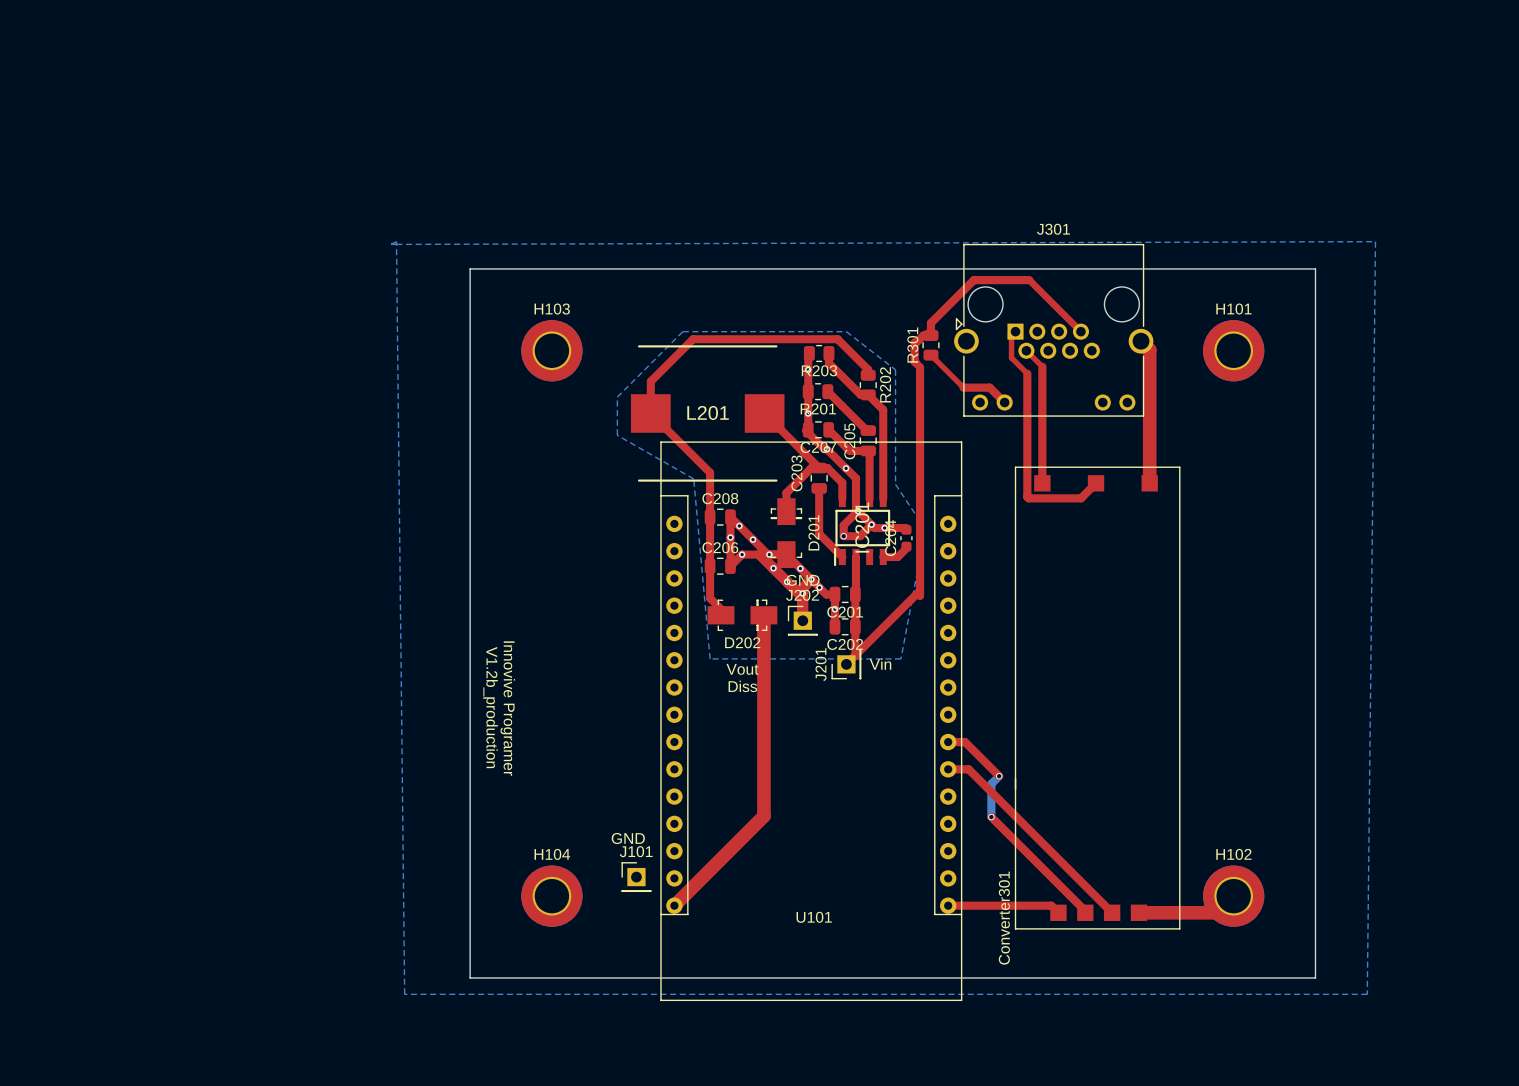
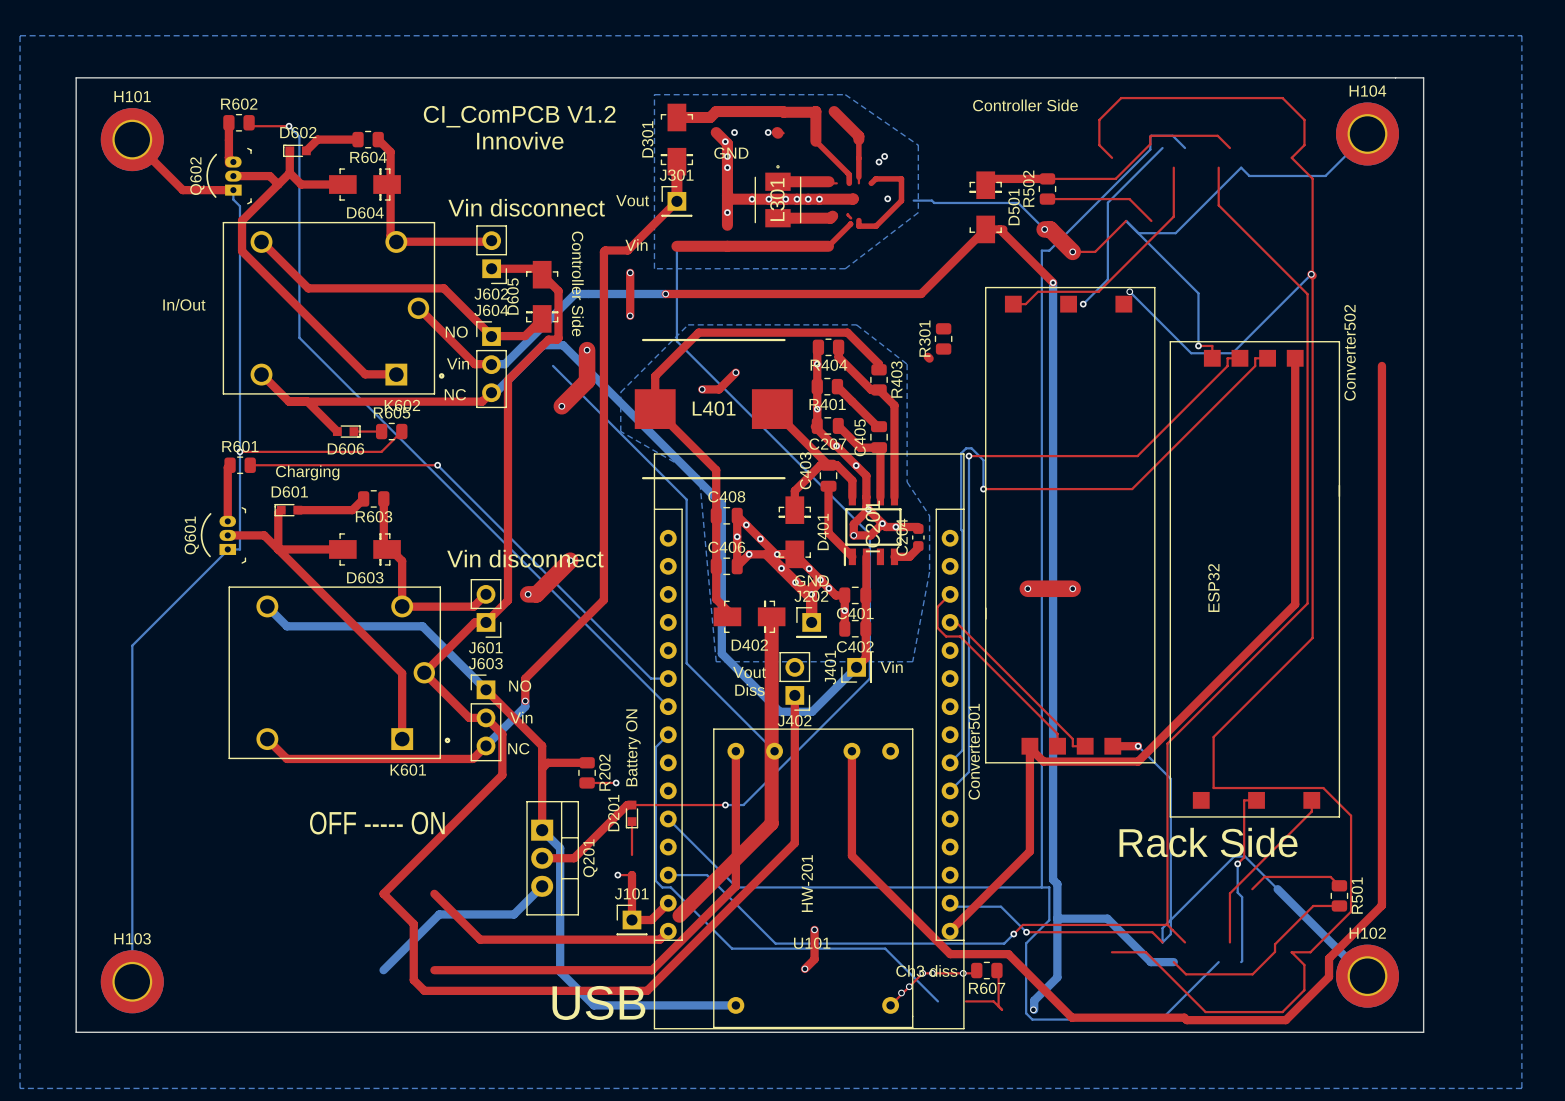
bottom zone outline: none -> (20, 35) (20, 1088) (1521, 1088) (1521, 35) (20, 35)
board edge: none -> (76, 77) (1423, 77) (1423, 1032) (76, 1032) (76, 77)
bottom zone outline: none -> (654, 94) (654, 268) (845, 268) (918, 212) (918, 145) (845, 94) (654, 94)
text: none -> Controller Side (1025, 105)
top track: none -> (834, 111) (858, 136) (858, 139)
text: none -> CI_ComPCB V1.2 (519, 116)
top track: none -> (676, 117) (710, 117) (716, 111) (815, 111) (815, 141)
R602: none -> (238, 122)
top track: none -> (249, 122) (252, 126) (289, 126)
bottom track: none -> (289, 126) (299, 136) (299, 337) (668, 706)
via: none -> (289, 126)
top track: none -> (716, 132) (727, 143) (727, 225)
via: none -> (734, 132)
via: none -> (768, 132)
top track: none -> (777, 132) (777, 133)
top track: none -> (782, 132) (783, 133)
bottom track: none -> (1367, 133) (1325, 175) (1249, 175) (1241, 167) (1175, 233) (1138, 233)
top track: none -> (132, 139) (182, 190) (233, 190)
top track: none -> (358, 139) (317, 139) (306, 150)
R604: none -> (368, 139)
top track: none -> (378, 139) (390, 151) (390, 235) (396, 241) (491, 240)
D301: none -> (676, 139)
top track: none -> (858, 139) (858, 183)
top track: none -> (228, 140) (228, 122) (228, 163)
text: none -> Innovive (520, 140)
via: none -> (725, 141)
top track: none -> (815, 141) (849, 174) (849, 183)
bottom track: none -> (1162, 148) (1107, 202) (1107, 279) (1083, 304)
bottom track: none -> (1185, 148) (1172, 135) (1151, 135) (1150, 149) (1049, 250) (1041, 250) (1041, 887)
top track: none -> (1229, 148) (1217, 135) (1151, 135) (1150, 144) (1115, 178) (992, 178) (985, 185)
top track: none -> (289, 150) (289, 173)
D602: none -> (296, 150)
text: none -> GND (731, 153)
via: none -> (727, 156)
via: none -> (884, 156)
top track: none -> (1112, 157) (1099, 145) (1099, 119) (1121, 98) (1282, 98) (1304, 119) (1304, 145) (1291, 157) (1312, 178) (1312, 638) (1213, 737) (1213, 788) (1323, 788) (1351, 815) (1351, 911) (1310, 952) (1291, 952) (1304, 964) (1304, 990) (1282, 1012) (1205, 1012) (1145, 952) (1111, 952)
top track: none -> (676, 161) (676, 201) (627, 250) (603, 251) (603, 599) (525, 678) (525, 701)
via: none -> (879, 162)
via: none -> (727, 167)
top track: none -> (1173, 167) (1173, 216) (1098, 291) (1038, 291) (1025, 304) (1013, 304)
top track: none -> (1218, 167) (1218, 205) (1307, 294) (1307, 603) (1167, 743) (1167, 924)
top track: none -> (289, 173) (242, 220) (242, 251) (365, 374) (396, 374)
top track: none -> (289, 173) (301, 184) (342, 184)
Q602: none -> (228, 176)
top track: none -> (233, 176) (269, 176) (278, 184)
top track: none -> (901, 178) (901, 200) (876, 226) (858, 226) (858, 220)
top track: none -> (901, 178) (875, 178) (871, 183)
top track: none -> (829, 181) (777, 181) (779, 183) (836, 183)
D604: none -> (364, 184)
R502: none -> (1047, 188)
bottom track: none -> (233, 190) (233, 199) (239, 206) (239, 549) (227, 549)
top track: none -> (727, 195) (730, 199) (853, 198)
L301: none -> (777, 196)
via: none -> (752, 199)
via: none -> (768, 199)
via: none -> (785, 199)
via: none -> (796, 199)
via: none -> (808, 199)
via: none -> (819, 199)
via: none -> (887, 198)
top track: none -> (1047, 199) (1129, 199) (1151, 220)
bottom track: none -> (913, 200) (931, 200) (934, 202) (1018, 202) (1044, 229)
text: none -> Vout (632, 200)
text: none -> Vin disconnect (526, 207)
D501: none -> (985, 207)
via: none -> (727, 212)
top track: none -> (847, 214) (850, 218)
top track: none -> (832, 216) (830, 218) (777, 218)
J301 name position: J301 (1053, 229) -> J301 (676, 175)
top track: none -> (1126, 220) (1095, 251) (1072, 251) (1050, 229) (1044, 229)
bottom track: none -> (1126, 220) (1198, 293) (1198, 345)
top track: none -> (850, 223) (828, 246) (676, 246)
top track: none -> (999, 229) (1053, 282)
top track: none -> (1003, 229) (985, 229) (921, 294) (665, 294)
via: none -> (1044, 229)
J301 footprint: [954, 243, 1154, 417] -> [661, 186, 693, 217]
bottom zone outline: (396, 244) (404, 994) (1367, 994) (1375, 241) (396, 244) -> none
bottom zone outline: (396, 244) (391, 244) (396, 241) (396, 244) -> none
top track: none -> (261, 241) (308, 288) (443, 288) (491, 336) (524, 336) (542, 318)
text: none -> Vin (636, 245)
bottom track: none -> (676, 246) (676, 341) (869, 534) (869, 678) (743, 805) (725, 805)
via: none -> (1072, 251)
J602: none -> (491, 254)
board edge: (470, 268) (470, 977) (1315, 977) (1315, 268) (470, 268) -> none
top track: none -> (491, 268) (536, 268) (558, 291) (558, 338) (548, 339) (507, 380) (507, 600) (486, 622) (474, 622) (424, 672) (469, 717) (486, 717) (502, 734) (502, 775) (383, 893) (413, 924) (413, 980) (424, 990) (647, 990) (794, 843) (794, 695)
top track: none -> (630, 272) (630, 315)
via: none -> (630, 272)
top track: none -> (1311, 274) (1312, 275)
bottom track: none -> (1311, 274) (1232, 353) (1191, 353) (1129, 291)
via: none -> (1311, 274)
bottom track: none -> (1053, 282) (1053, 879) (1057, 884) (1057, 977) (1034, 1000) (1034, 1009)
via: none -> (1053, 282)
text: none -> Controller Side (577, 283)
via: none -> (1129, 291)
bottom track: none -> (665, 294) (575, 294) (504, 364) (491, 364)
via: none -> (665, 294)
D605: none -> (542, 296)
via: none -> (1083, 304)
text: none -> In/Out (184, 304)
K602: none -> (333, 308)
top track: none -> (418, 308) (474, 364) (491, 364)
via: none -> (630, 315)
top track: (1015, 331) (1011, 335) (1011, 357) (1027, 373) (1027, 496) (1081, 498) (1096, 483) -> none
top track: (1080, 331) (1029, 280) (973, 280) (930, 323) (930, 335) (923, 335) (916, 342) -> none
text: none -> NO (456, 332)
top track: (1141, 341) (1149, 349) (1149, 483) -> none
top track: (914, 342) (914, 361) -> none
H103 position: (551, 350) -> (132, 981)
top track: (1026, 350) (1042, 366) (1042, 483) -> none
H101 position: (1233, 350) -> (132, 139)
top track: none -> (1198, 345) (1212, 345) (1212, 358)
via: none -> (1198, 345)
top track: (930, 355) (963, 387) (989, 387) (1004, 402) -> none
top track: none -> (587, 350) (587, 381) (561, 406)
via: none -> (587, 350)
top track: none -> (1239, 358) (1227, 358) (1227, 366) (1137, 456) (968, 456)
top track: none -> (1267, 358) (1255, 358) (1255, 366) (1132, 489) (983, 489)
top track: none -> (1295, 358) (1295, 604) (1138, 761) (1043, 761) (1029, 747)
top track: (920, 367) (920, 596) -> none
text: none -> Vin (457, 363)
J604: none -> (491, 364)
R203 name: R203 (819, 370) -> R404 (828, 365)
bottom track: none -> (553, 365) (686, 499) (686, 663) (774, 751)
top track: none -> (1381, 365) (1381, 905) (1329, 958) (1329, 976) (1285, 1020) (1071, 1017) (1008, 954) (950, 954) (851, 855) (851, 751)
top track: none -> (735, 372) (719, 389) (702, 389)
via: none -> (735, 372)
top track: none -> (261, 374) (289, 401) (482, 401) (491, 392)
R202 name: R202 (885, 384) -> R403 (896, 379)
via: none -> (702, 389)
bottom track: none -> (491, 392) (496, 392) (543, 345) (563, 345) (721, 504) (721, 653) (779, 711) (812, 711) (856, 667)
text: none -> NC (455, 394)
top track: none -> (307, 401) (337, 431)
R201 name: R201 (818, 408) -> R401 (827, 404)
via: none -> (561, 406)
L201 name: L201 (708, 412) -> L401 (714, 408)
D606: none -> (346, 431)
top track: none -> (353, 431) (381, 431)
R605: none -> (391, 431)
top track: none -> (401, 431) (381, 451) (239, 451)
C205 name: C205 (849, 441) -> C405 (860, 437)
via: none -> (239, 451)
bottom track: none -> (968, 456) (968, 771) (950, 790)
via: none -> (968, 456)
R601: none -> (240, 465)
top track: none -> (250, 465) (437, 465)
bottom track: none -> (437, 465) (650, 678) (668, 678)
via: none -> (437, 465)
top track: none -> (228, 466) (230, 465) (227, 467) (227, 521)
C203 name: C203 (796, 473) -> C403 (805, 470)
text: none -> Charging (307, 472)
bottom track: none -> (983, 489) (983, 460) (971, 448) (966, 448) (961, 453) (962, 750) (950, 762)
via: none -> (983, 489)
C208 name: C208 (720, 498) -> C408 (726, 496)
top track: none -> (363, 498) (352, 510) (297, 510)
R603: none -> (373, 498)
top track: none -> (281, 510) (278, 513) (278, 549) (342, 549)
D601: none -> (288, 510)
top track: none -> (383, 520) (383, 498) (383, 542) (402, 561) (402, 606) (473, 606) (486, 594)
Converter501: none -> (1070, 525)
D201 name: D201 (813, 532) -> D401 (823, 531)
Q601: none -> (223, 535)
top track: none -> (227, 535) (264, 535) (402, 673) (402, 739)
C206 name: C206 (720, 547) -> C406 (726, 547)
bottom track: none -> (228, 549) (132, 645) (132, 981)
D603: none -> (364, 549)
text: none -> Vin disconnect (525, 558)
top track: none -> (570, 560) (536, 594) (528, 594)
via: none -> (570, 560)
Converter502: none -> (1254, 579)
text: none -> ESP32 (1213, 588)
top track: none -> (1027, 588) (1072, 588)
via: none -> (1027, 588)
via: none -> (1072, 588)
top track: (918, 592) (846, 664) -> none
via: none -> (528, 594)
top track: none -> (950, 594) (937, 606) (937, 627) (946, 636) (960, 636) (1057, 733) (1057, 746)
bottom track: none -> (267, 606) (286, 626) (422, 626) (486, 689)
J601: none -> (486, 608)
C201 name: C201 (845, 612) -> C401 (855, 613)
top track: none -> (950, 622) (956, 622) (1072, 738) (1072, 746) (1085, 746)
D202 name: D202 (742, 642) -> D402 (749, 645)
C202 name: C202 (845, 644) -> C402 (855, 646)
J201 name: J201 (821, 664) -> J401 (830, 667)
K601: none -> (339, 672)
J402: none -> (794, 681)
text: none -> NO (520, 686)
top track: none -> (486, 689) (542, 745) (542, 830)
bottom track: none -> (525, 701) (525, 706) (486, 745)
via: none -> (525, 701)
Converter301: (1097, 698) -> none
text: V1.2b_production (490, 707) -> none
text: Innovive Programer (507, 708) -> none
J603: none -> (486, 717)
text: none -> Vin (521, 717)
U101 position: (811, 721) -> (809, 741)
bottom track: none -> (668, 734) (655, 747) (655, 881) (662, 887) (670, 887) (732, 948) (885, 948) (937, 1001)
top track: none -> (267, 739) (286, 758) (473, 758) (486, 745)
top track: none -> (1029, 746) (1029, 851) (950, 931)
top track: none -> (1137, 746) (1112, 746) (1138, 746)
bottom track: none -> (1138, 746) (1170, 778) (1170, 934) (1162, 942) (1162, 928) (1234, 856) (1245, 856) (1364, 976) (1367, 976)
via: none -> (1138, 746)
text: none -> Battery ON (633, 747)
top track: (948, 742) (965, 742) (999, 776) -> none
text: none -> NC (518, 748)
top track: none -> (735, 751) (735, 886) (652, 970) (434, 970)
top track: none -> (587, 762) (547, 762) (542, 768)
R202: none -> (587, 772)
top track: (948, 769) (968, 769) (1112, 912) -> none
top track: none -> (587, 782) (616, 782)
via: none -> (616, 782)
bottom track: (999, 776) (991, 783) (991, 817) -> none
via: (999, 776) -> none
top track: none -> (1256, 800) (1244, 800) (1244, 857) (1237, 863)
top track: none -> (1311, 800) (1311, 811) (1229, 893) (1229, 942)
top track: none -> (725, 805) (627, 805) (574, 858) (542, 858)
via: none -> (725, 805)
D201: none -> (632, 814)
bottom track: none -> (668, 818) (736, 887) (1049, 887) (1049, 920) (1026, 943) (1026, 1013) (1032, 1019) (1161, 1019) (1218, 962)
top track: none -> (632, 821) (632, 854)
text: none -> OFF ----- ON (377, 823)
top track: (991, 817) (1085, 912) -> none
via: (991, 817) -> none
bottom track: none -> (542, 830) (560, 848) (560, 971) (593, 1005) (735, 1005)
text: none -> Rack Side (1208, 842)
text: GND (628, 838) -> none
Q201: none -> (552, 858)
bottom track: none -> (1237, 863) (1237, 892) (1242, 897) (1241, 962)
via: none -> (1237, 863)
top track: none -> (617, 875) (632, 875) (632, 920) (651, 920) (668, 903)
via: none -> (617, 875)
bottom track: none -> (668, 875) (707, 875) (775, 943) (1004, 943) (1013, 934)
HW-201: none -> (813, 878)
top track: none -> (1339, 885) (1330, 876) (1264, 876) (1252, 889)
bottom track: none -> (542, 886) (514, 914) (439, 914) (383, 970)
J101 position: (636, 877) -> (632, 920)
top track: none -> (434, 893) (480, 939) (659, 939) (668, 931)
R501: none -> (1339, 895)
bottom track: none -> (950, 903) (950, 906) (1001, 906) (1026, 932)
H104 position: (551, 896) -> (1367, 133)
top track: (1233, 896) (1217, 912) (1138, 912) -> none
H102 position: (1233, 896) -> (1367, 976)
top track: none -> (1339, 905) (1313, 905) (1275, 944) (1275, 951) (1252, 974) (1186, 974) (1173, 962)
top track: (948, 905) (1051, 905) (1058, 912) -> none
bottom track: none -> (1057, 918) (1107, 918) (1150, 962) (1173, 962)
top track: none -> (1167, 924) (1185, 942)
top track: none -> (1167, 924) (1022, 924) (1013, 934)
top track: none -> (814, 929) (814, 959) (804, 968)
via: none -> (814, 929)
top track: none -> (1026, 932) (1152, 932) (1162, 942)
via: none -> (1026, 932)
via: none -> (1013, 934)
via: none -> (804, 968)
R607: none -> (986, 970)
text: none -> Ch3 diss (926, 970)
via: none -> (922, 973)
via: none -> (932, 973)
via: none -> (963, 973)
top track: none -> (978, 973) (922, 973) (890, 1005)
top track: none -> (998, 973) (998, 1006)
via: none -> (909, 986)
via: none -> (901, 992)
top track: none -> (966, 1001) (993, 1001) (1002, 1009)
text: none -> USB (598, 1002)
via: none -> (1033, 1009)

